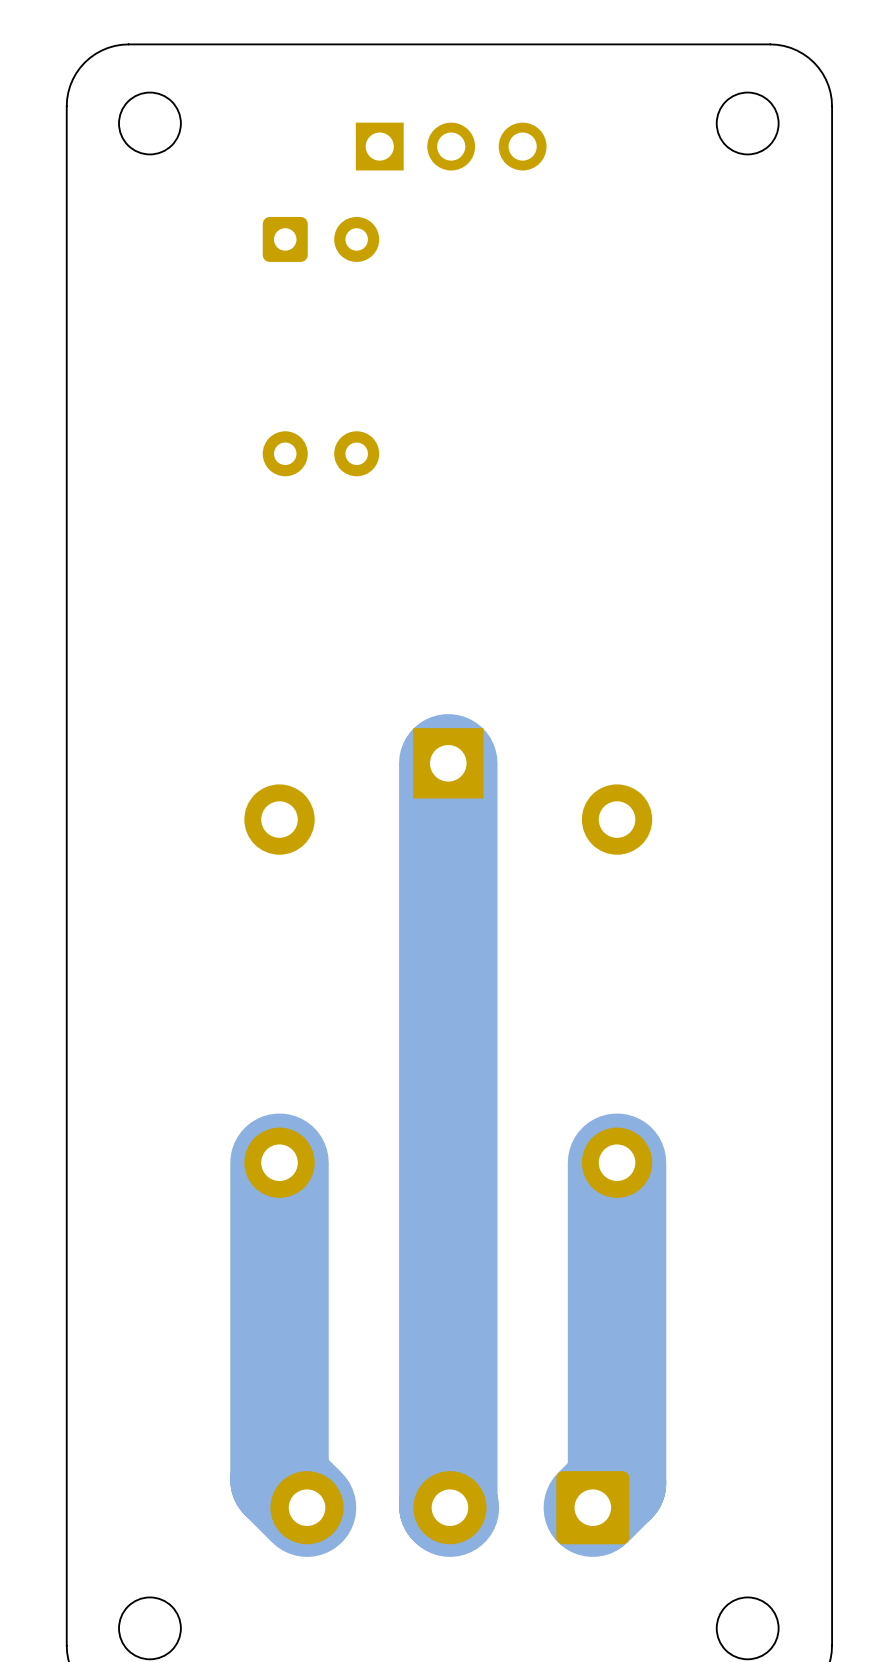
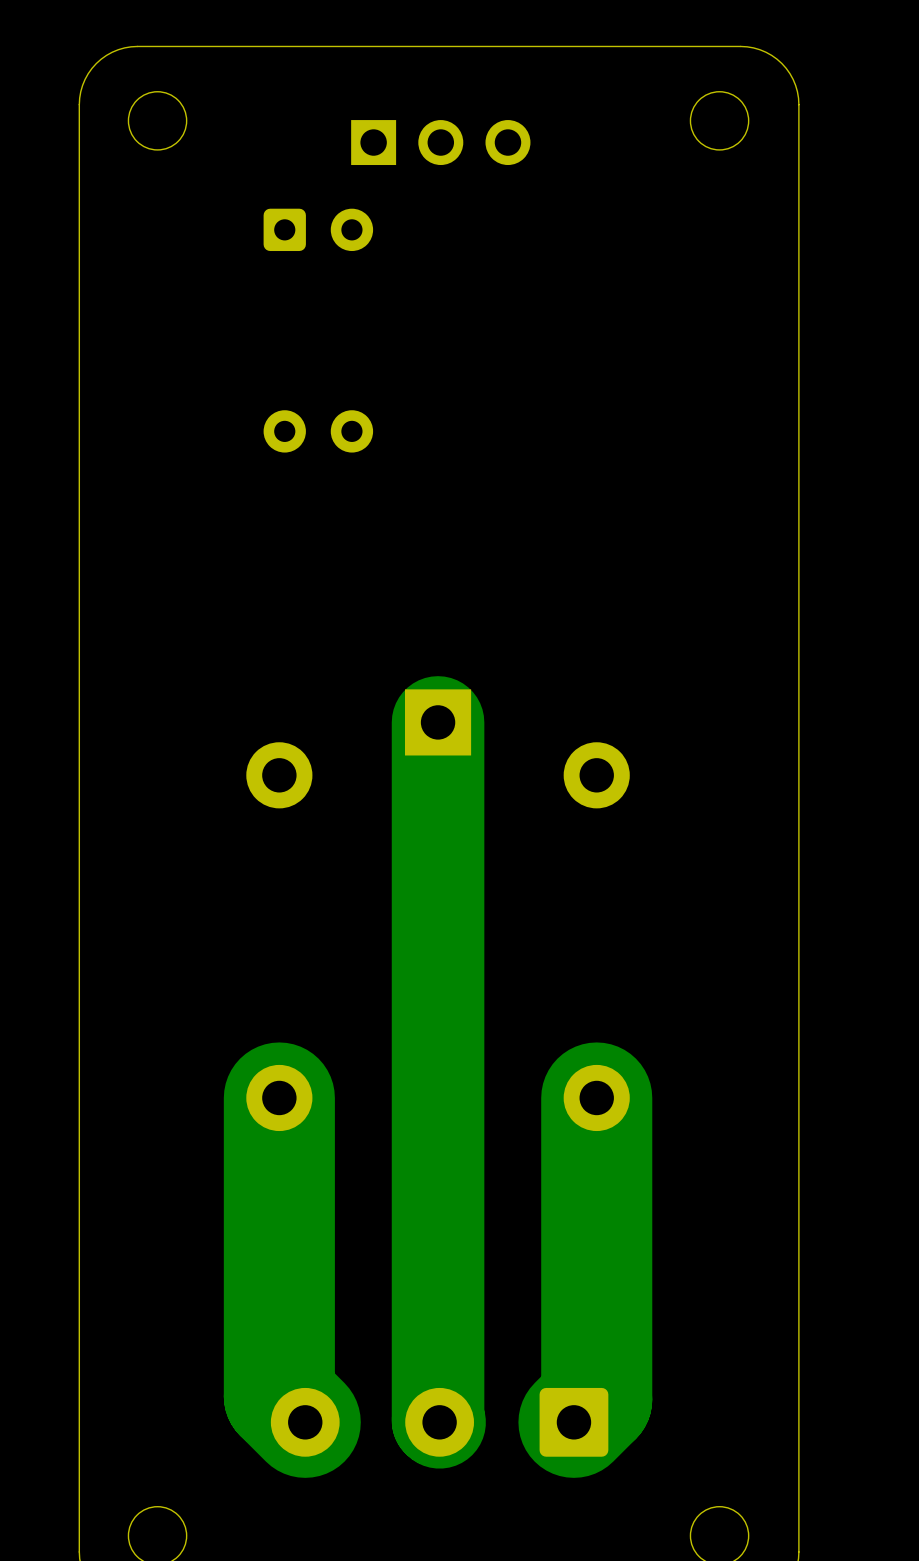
track width: thin (279, 1162) (279, 1480) (307, 1507) -> thick (279, 1097) (279, 1396) (305, 1422)
track width: thin (617, 1162) (617, 1483) (592, 1507) -> thick (596, 1097) (596, 1399) (573, 1422)

